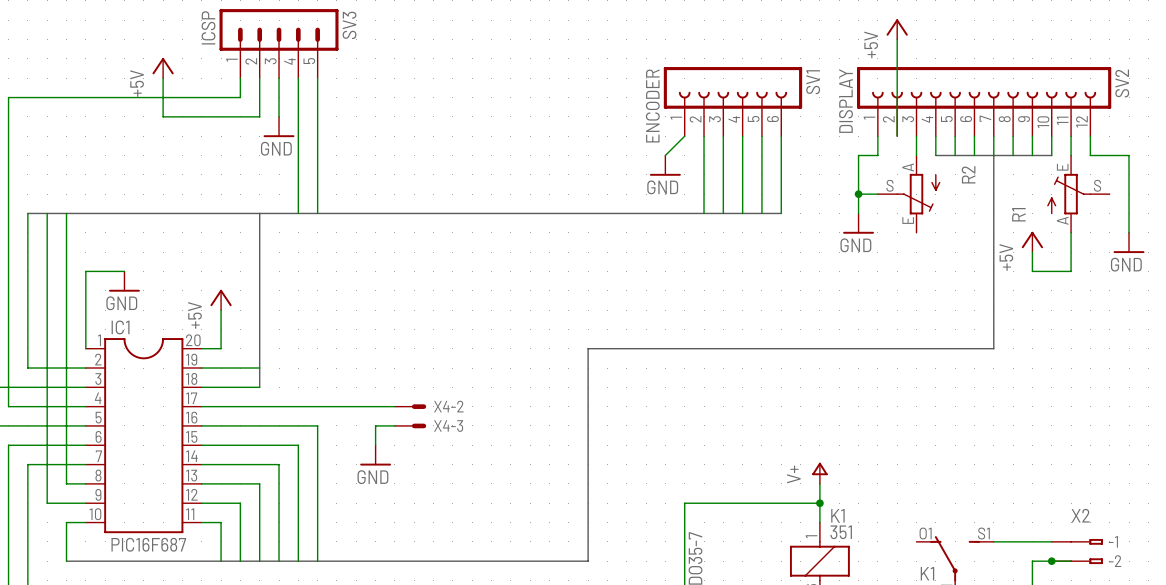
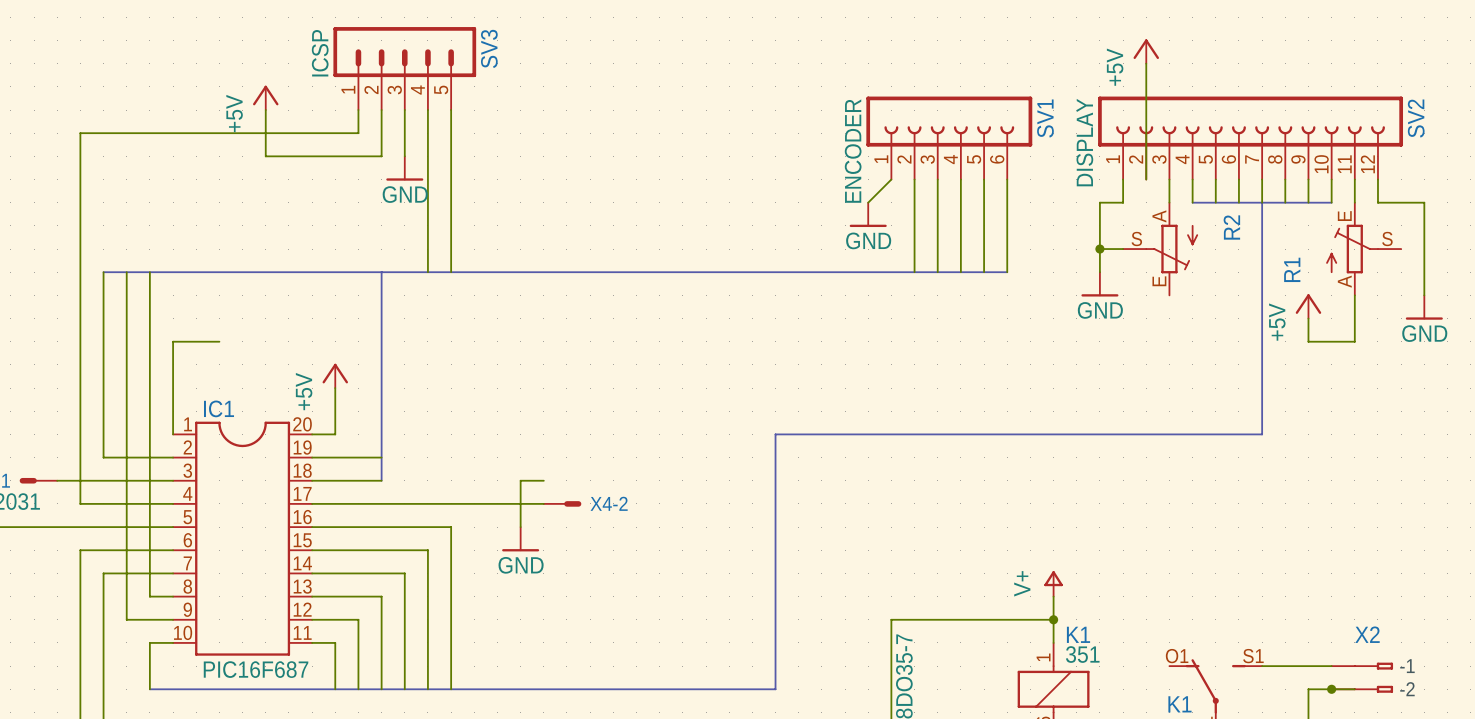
power symbol: GND (124, 281) -> none
wire: none -> (543, 480) (520, 480) (520, 527)
wire: (394, 425) (375, 425) (375, 445) -> none
X4-3: (410, 425) -> none
power symbol position: GND (375, 455) -> GND (520, 539)

